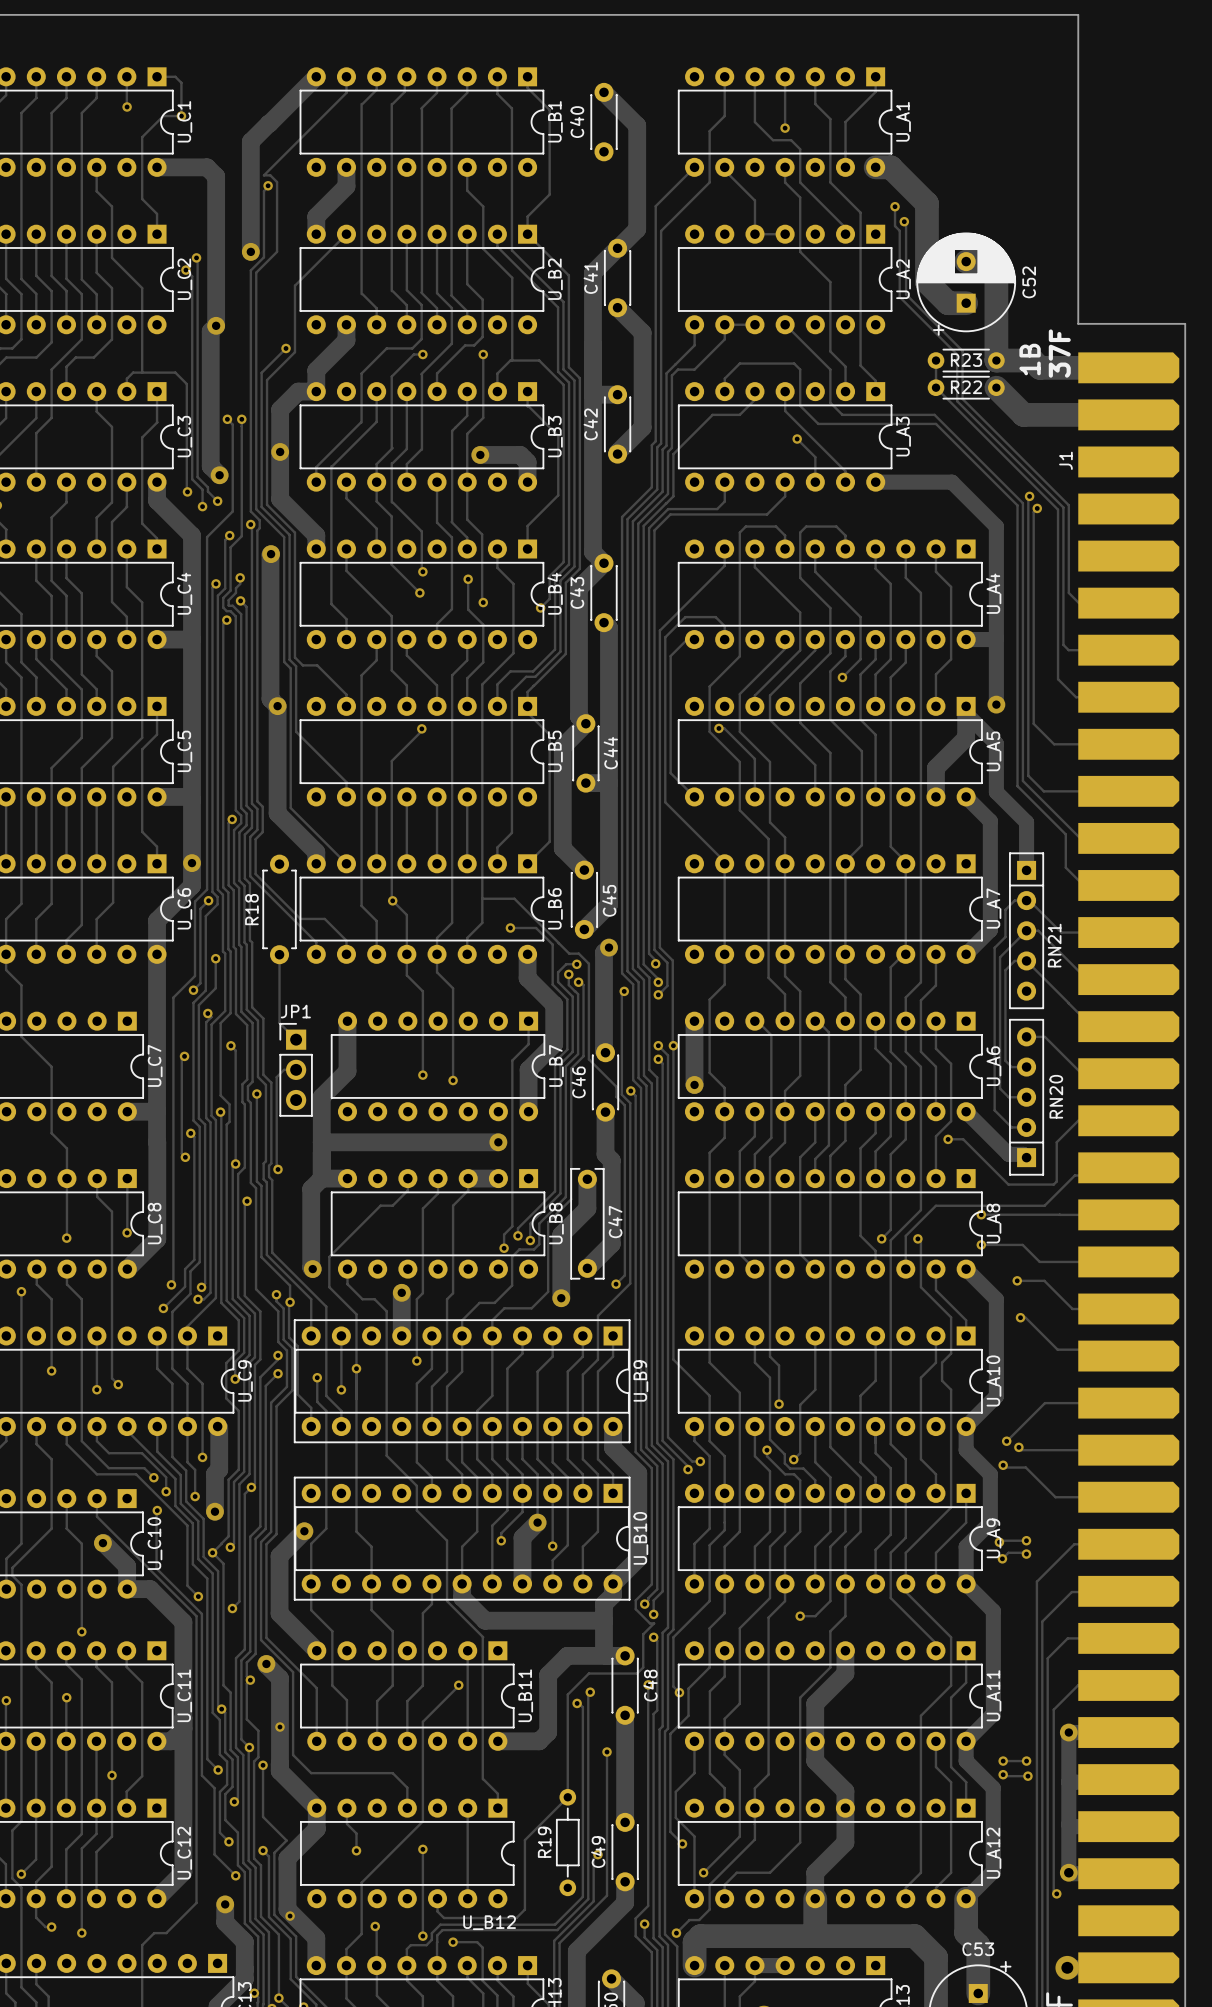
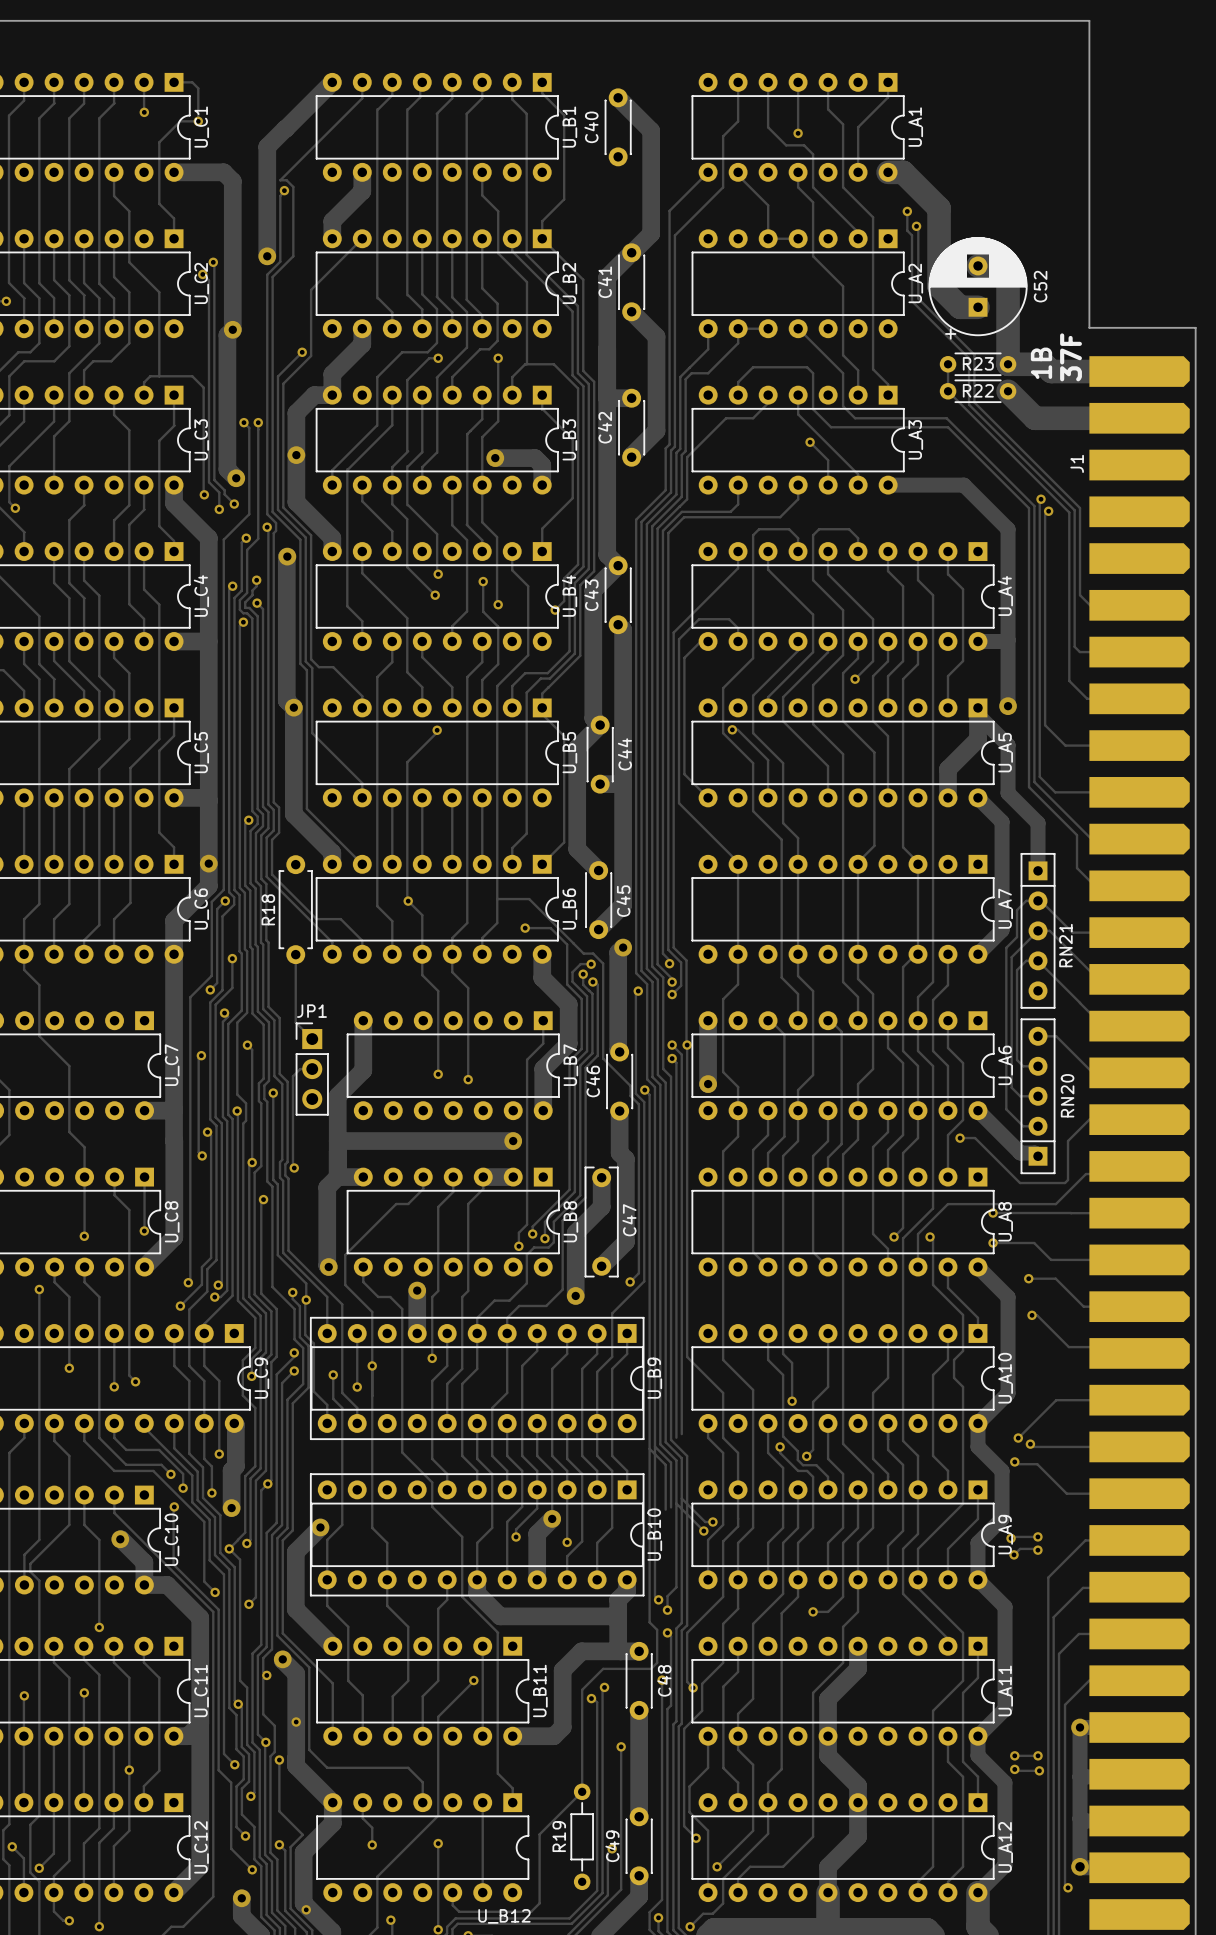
track: (613, 1426) (613, 1448) (638, 1473) (638, 1558) (613, 1583) -> none
track: (668, 1437) (692, 1461) (700, 1461) -> none
track: (662, 1440) (687, 1466) (687, 1469) -> none
via: (700, 1461) -> none
via: (687, 1469) -> none
track: none -> (681, 1498) (705, 1522) (712, 1522)
track: none -> (676, 1503) (703, 1531)
track: (657, 1511) (657, 1589) (644, 1604) -> (654, 1446) (654, 1596) (658, 1599)
track: (651, 1513) (651, 1584) (635, 1600) (635, 1609) (649, 1623) (654, 1623) (643, 1634) -> (649, 1448) (649, 1622) (657, 1629)
via: none -> (712, 1522)
via: none -> (703, 1531)

